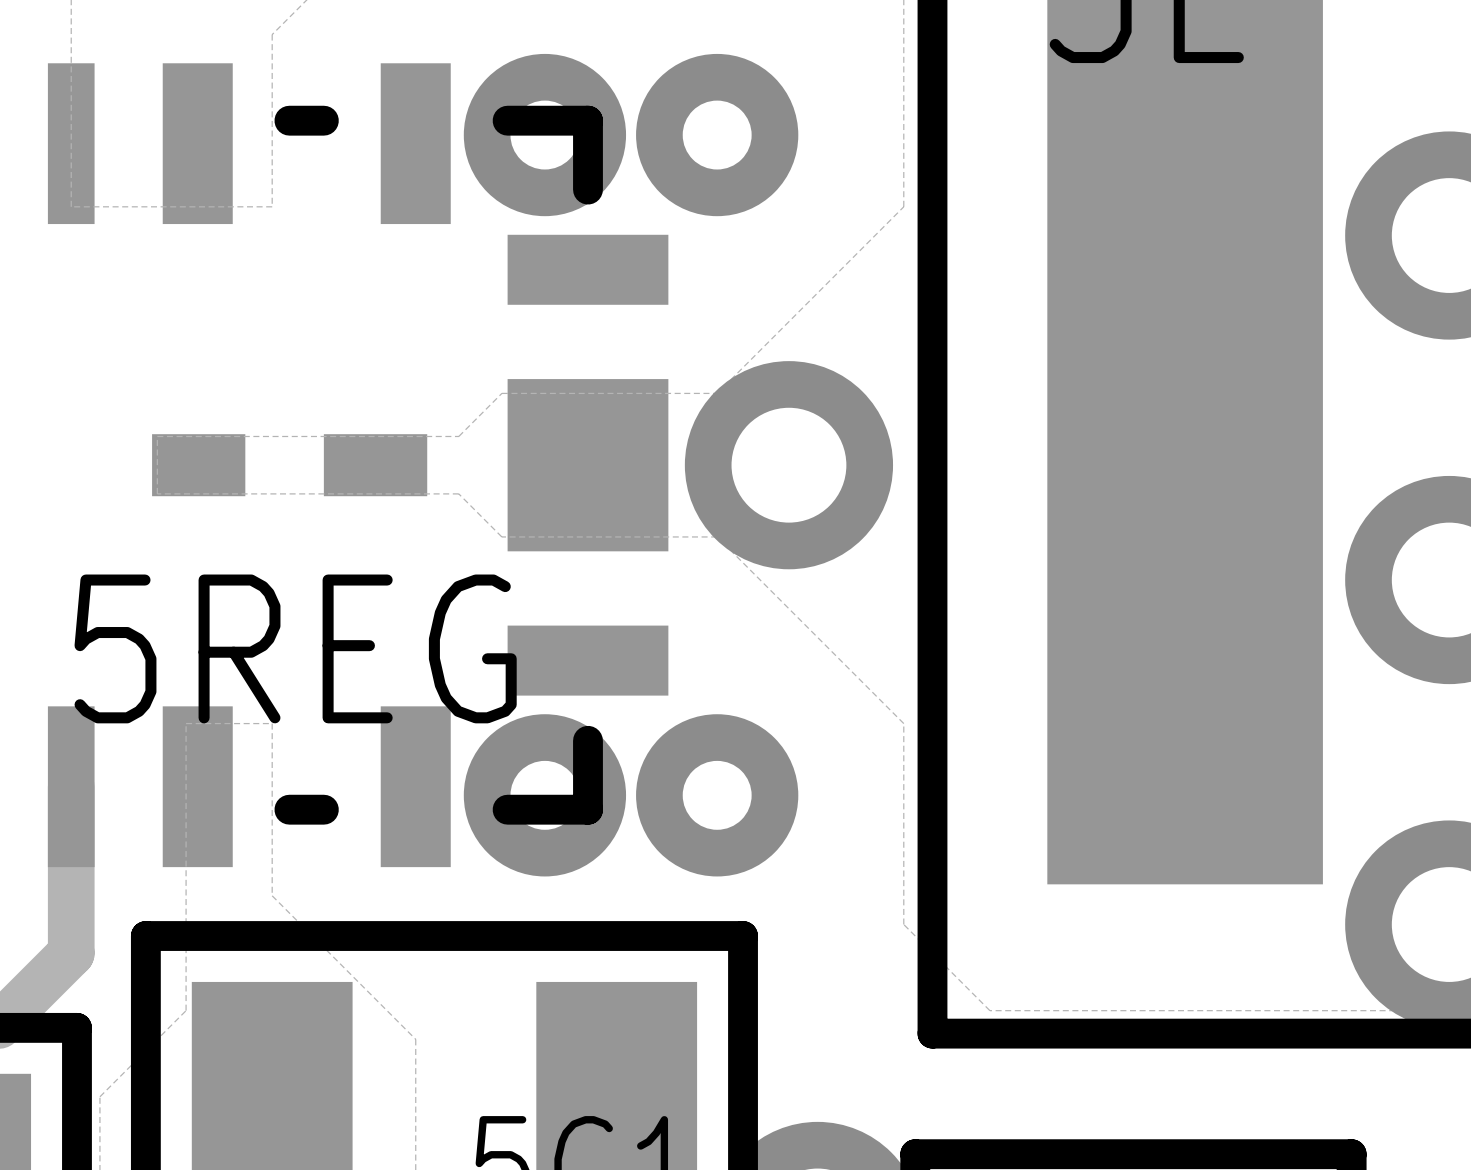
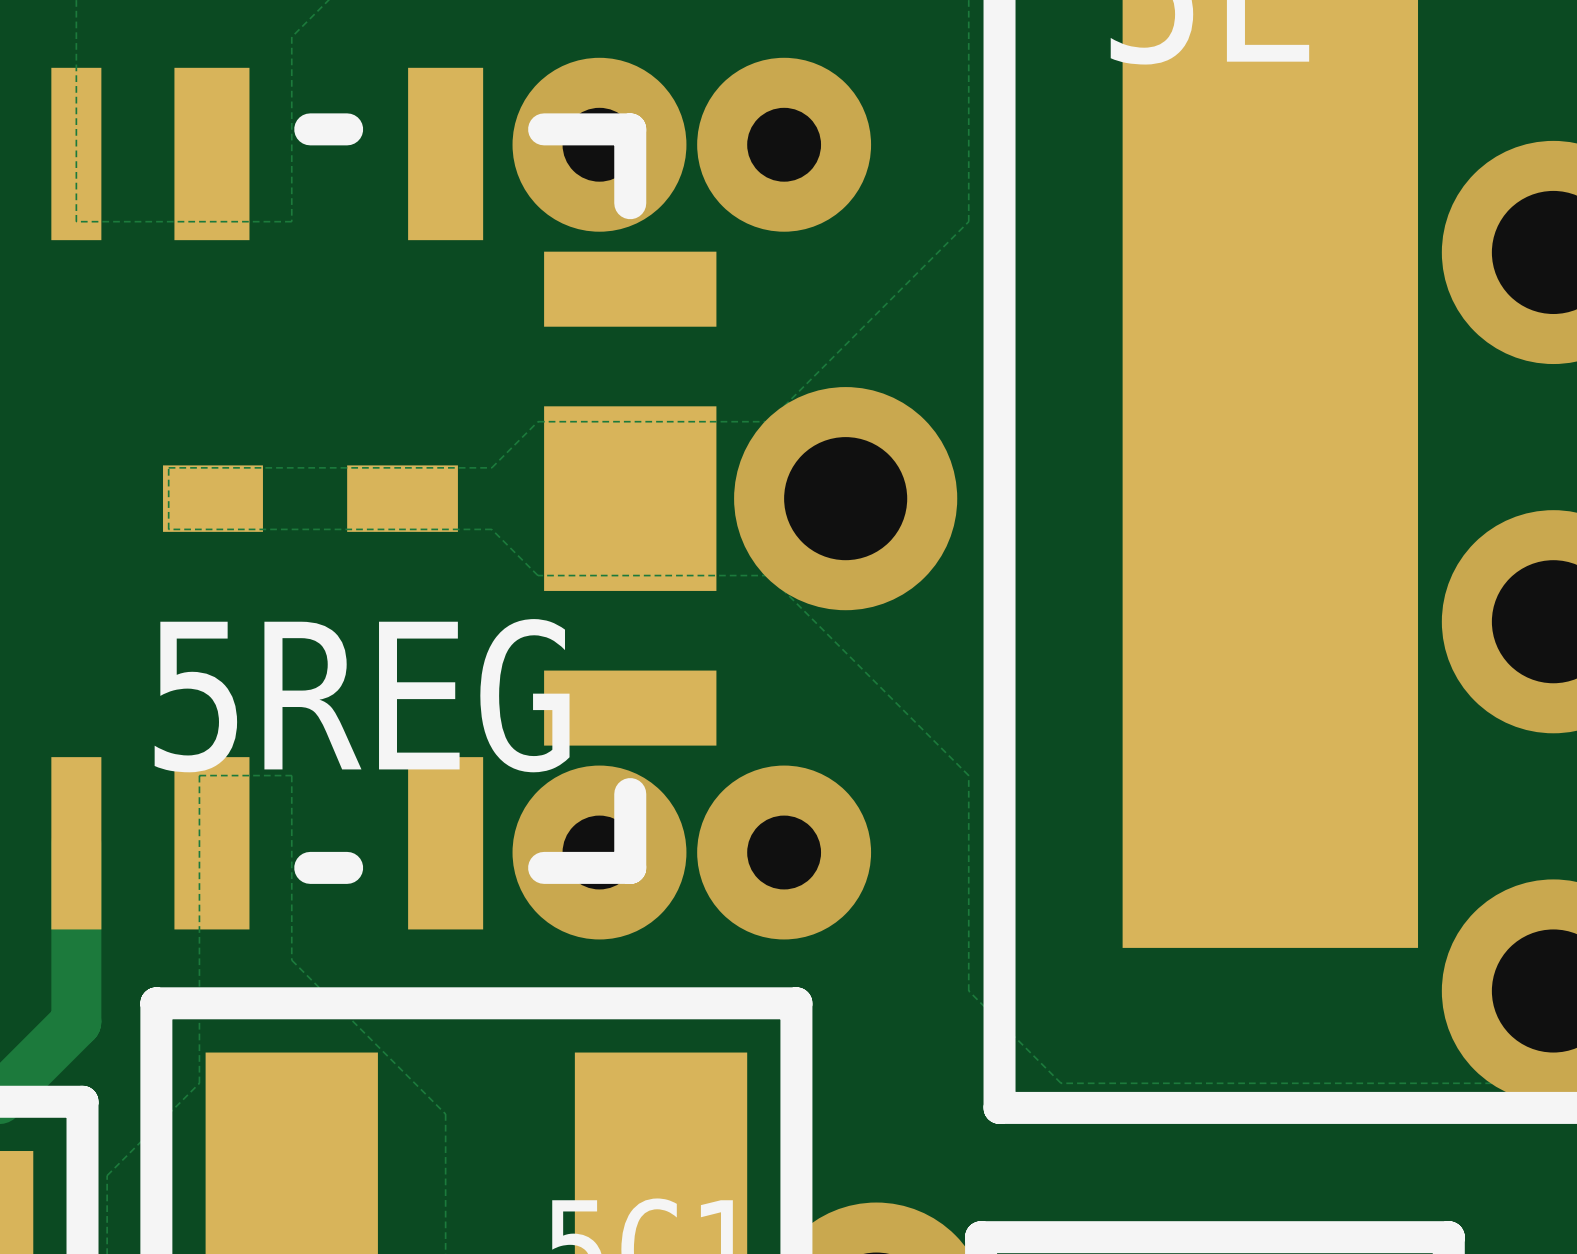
via position: (544, 135) -> (599, 144)
via position: (717, 135) -> (784, 144)
via position: (544, 795) -> (599, 852)
via position: (717, 795) -> (784, 852)

